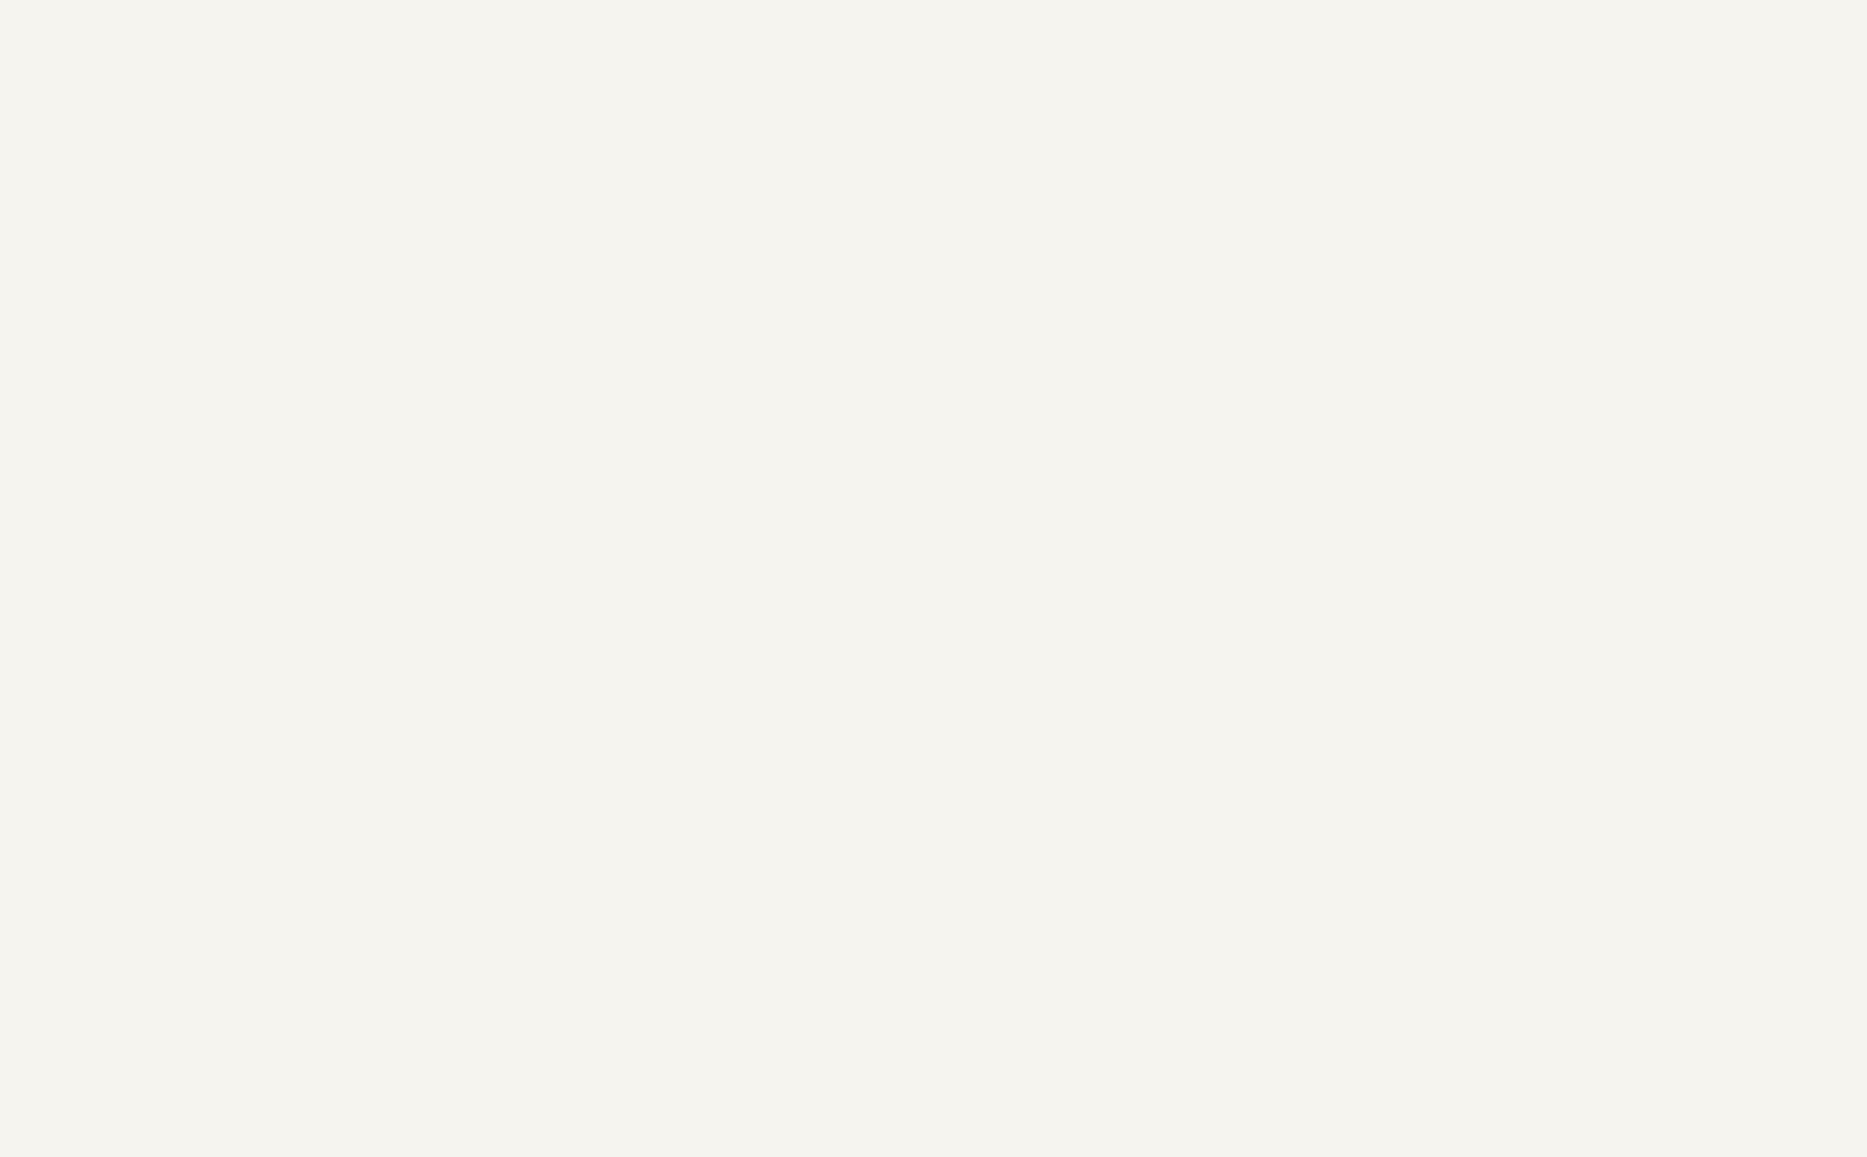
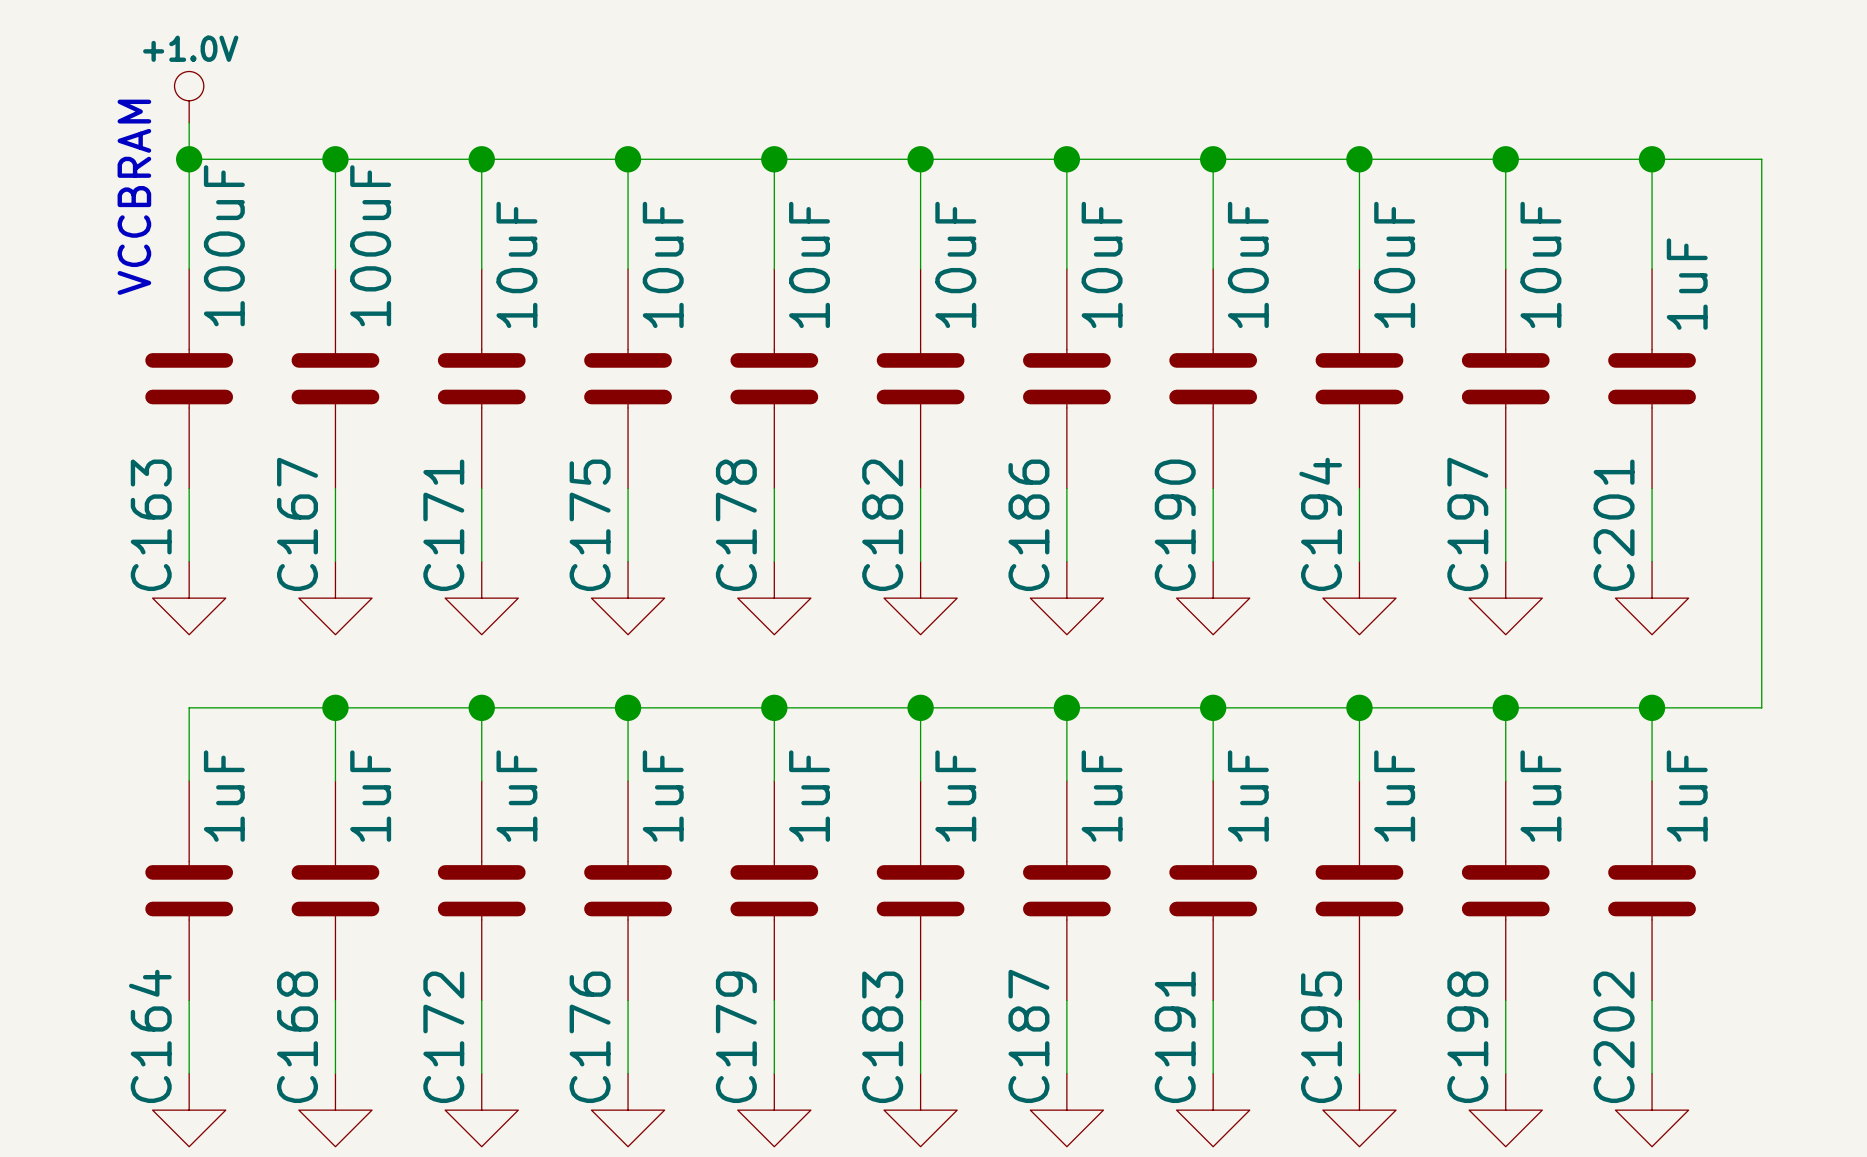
power symbol: none -> +1.0V (189, 97)
wire: none -> (189, 122) (189, 269)
wire: none -> (189, 159) (1761, 159) (1761, 707) (189, 707) (189, 781)
junction: none -> (189, 159)
wire: none -> (335, 159) (335, 269)
junction: none -> (335, 159)
wire: none -> (481, 159) (481, 269)
junction: none -> (481, 159)
wire: none -> (628, 159) (628, 269)
junction: none -> (628, 159)
wire: none -> (774, 159) (774, 269)
junction: none -> (774, 159)
wire: none -> (920, 159) (920, 269)
junction: none -> (920, 159)
wire: none -> (1066, 159) (1066, 269)
junction: none -> (1066, 159)
wire: none -> (1213, 159) (1213, 269)
junction: none -> (1213, 159)
wire: none -> (1359, 159) (1359, 269)
junction: none -> (1359, 159)
wire: none -> (1505, 159) (1505, 269)
junction: none -> (1505, 159)
wire: none -> (1652, 159) (1652, 269)
junction: none -> (1652, 159)
text: none -> VCCBRAM (134, 197)
C163: none -> 100uF (189, 378)
C167: none -> 100uF (335, 378)
C171: none -> 10uF (481, 378)
C175: none -> 10uF (628, 378)
C178: none -> 10uF (774, 378)
C182: none -> 10uF (920, 378)
C186: none -> 10uF (1066, 378)
C190: none -> 10uF (1213, 378)
C194: none -> 10uF (1359, 378)
C197: none -> 10uF (1505, 378)
C201: none -> 1uF (1652, 378)
wire: none -> (189, 488) (189, 561)
wire: none -> (335, 488) (335, 561)
wire: none -> (481, 488) (481, 561)
wire: none -> (628, 488) (628, 561)
wire: none -> (774, 488) (774, 561)
wire: none -> (920, 488) (920, 561)
wire: none -> (1066, 488) (1066, 561)
wire: none -> (1213, 488) (1213, 561)
wire: none -> (1359, 488) (1359, 561)
wire: none -> (1505, 488) (1505, 561)
wire: none -> (1652, 488) (1652, 561)
power symbol: none -> (189, 598)
power symbol: none -> (335, 598)
power symbol: none -> (481, 598)
power symbol: none -> (628, 598)
power symbol: none -> (774, 598)
power symbol: none -> (920, 598)
power symbol: none -> (1066, 598)
power symbol: none -> (1213, 598)
power symbol: none -> (1359, 598)
power symbol: none -> (1505, 598)
power symbol: none -> (1652, 598)
wire: none -> (335, 707) (335, 781)
junction: none -> (335, 707)
wire: none -> (481, 707) (481, 781)
junction: none -> (481, 707)
wire: none -> (628, 707) (628, 781)
junction: none -> (628, 707)
wire: none -> (774, 707) (774, 781)
junction: none -> (774, 707)
wire: none -> (920, 707) (920, 781)
junction: none -> (920, 707)
wire: none -> (1066, 707) (1066, 781)
junction: none -> (1066, 707)
wire: none -> (1213, 707) (1213, 781)
junction: none -> (1213, 707)
wire: none -> (1359, 707) (1359, 781)
junction: none -> (1359, 707)
wire: none -> (1505, 707) (1505, 781)
junction: none -> (1505, 707)
wire: none -> (1652, 707) (1652, 781)
junction: none -> (1652, 707)
C164: none -> 1uF (189, 890)
C168: none -> 1uF (335, 890)
C172: none -> 1uF (481, 890)
C176: none -> 1uF (628, 890)
C179: none -> 1uF (774, 890)
C183: none -> 1uF (920, 890)
C187: none -> 1uF (1066, 890)
C191: none -> 1uF (1213, 890)
C195: none -> 1uF (1359, 890)
C198: none -> 1uF (1505, 890)
C202: none -> 1uF (1652, 890)
wire: none -> (189, 1000) (189, 1073)
wire: none -> (335, 1000) (335, 1073)
wire: none -> (481, 1000) (481, 1073)
wire: none -> (628, 1000) (628, 1073)
wire: none -> (774, 1000) (774, 1073)
wire: none -> (920, 1000) (920, 1073)
wire: none -> (1066, 1000) (1066, 1073)
wire: none -> (1213, 1000) (1213, 1073)
wire: none -> (1359, 1000) (1359, 1073)
wire: none -> (1505, 1000) (1505, 1073)
wire: none -> (1652, 1000) (1652, 1073)
power symbol: none -> (189, 1110)
power symbol: none -> (335, 1110)
power symbol: none -> (481, 1110)
power symbol: none -> (628, 1110)
power symbol: none -> (774, 1110)
power symbol: none -> (920, 1110)
power symbol: none -> (1066, 1110)
power symbol: none -> (1213, 1110)
power symbol: none -> (1359, 1110)
power symbol: none -> (1505, 1110)
power symbol: none -> (1652, 1110)

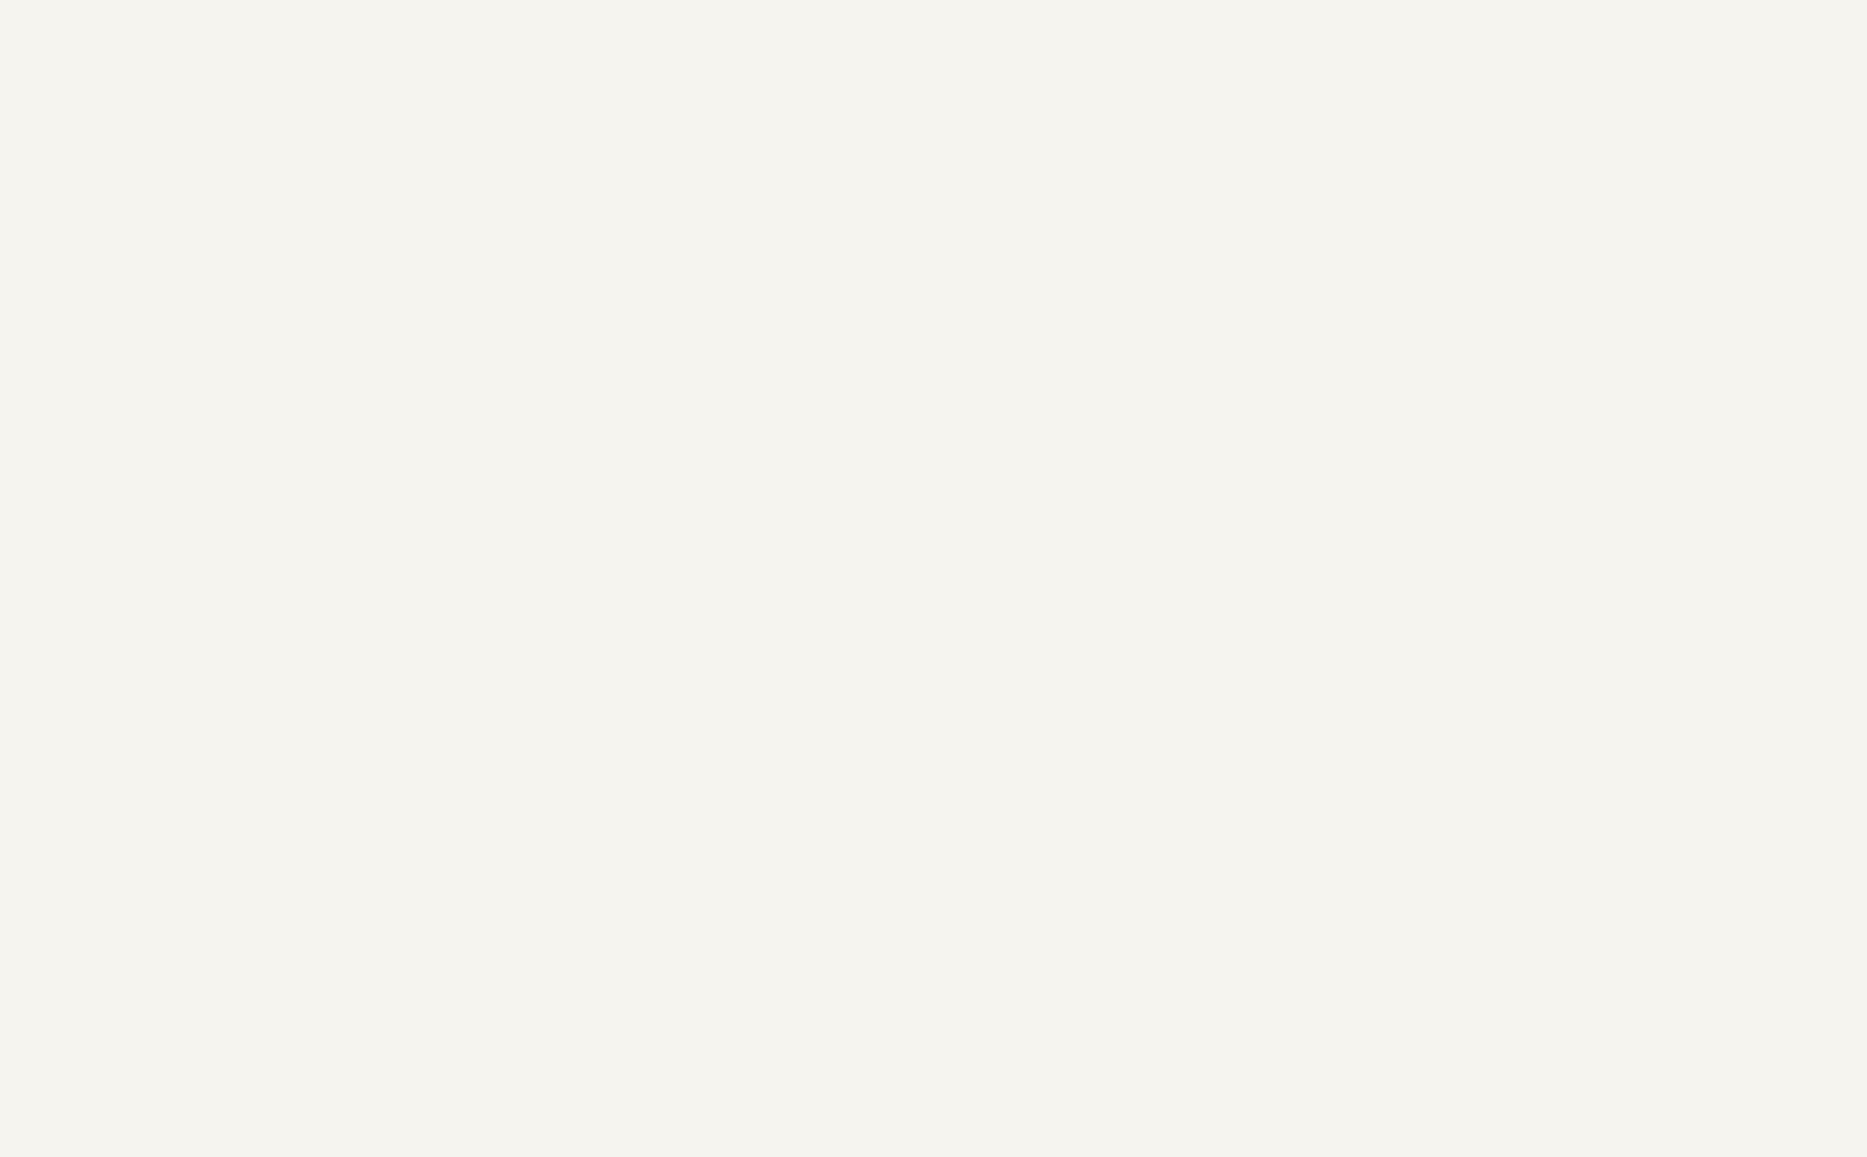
power symbol: +1.0V (189, 97) -> none
wire: (189, 122) (189, 269) -> none
wire: (189, 159) (1761, 159) (1761, 707) (189, 707) (189, 781) -> none
junction: (189, 159) -> none
wire: (335, 159) (335, 269) -> none
junction: (335, 159) -> none
wire: (481, 159) (481, 269) -> none
junction: (481, 159) -> none
wire: (628, 159) (628, 269) -> none
junction: (628, 159) -> none
wire: (774, 159) (774, 269) -> none
junction: (774, 159) -> none
wire: (920, 159) (920, 269) -> none
junction: (920, 159) -> none
wire: (1066, 159) (1066, 269) -> none
junction: (1066, 159) -> none
wire: (1213, 159) (1213, 269) -> none
junction: (1213, 159) -> none
wire: (1359, 159) (1359, 269) -> none
junction: (1359, 159) -> none
wire: (1505, 159) (1505, 269) -> none
junction: (1505, 159) -> none
wire: (1652, 159) (1652, 269) -> none
junction: (1652, 159) -> none
text: VCCBRAM (134, 197) -> none
C163: 100uF (189, 378) -> none
C167: 100uF (335, 378) -> none
C171: 10uF (481, 378) -> none
C175: 10uF (628, 378) -> none
C178: 10uF (774, 378) -> none
C182: 10uF (920, 378) -> none
C186: 10uF (1066, 378) -> none
C190: 10uF (1213, 378) -> none
C194: 10uF (1359, 378) -> none
C197: 10uF (1505, 378) -> none
C201: 1uF (1652, 378) -> none
wire: (189, 488) (189, 561) -> none
wire: (335, 488) (335, 561) -> none
wire: (481, 488) (481, 561) -> none
wire: (628, 488) (628, 561) -> none
wire: (774, 488) (774, 561) -> none
wire: (920, 488) (920, 561) -> none
wire: (1066, 488) (1066, 561) -> none
wire: (1213, 488) (1213, 561) -> none
wire: (1359, 488) (1359, 561) -> none
wire: (1505, 488) (1505, 561) -> none
wire: (1652, 488) (1652, 561) -> none
power symbol: (189, 598) -> none
power symbol: (335, 598) -> none
power symbol: (481, 598) -> none
power symbol: (628, 598) -> none
power symbol: (774, 598) -> none
power symbol: (920, 598) -> none
power symbol: (1066, 598) -> none
power symbol: (1213, 598) -> none
power symbol: (1359, 598) -> none
power symbol: (1505, 598) -> none
power symbol: (1652, 598) -> none
wire: (335, 707) (335, 781) -> none
junction: (335, 707) -> none
wire: (481, 707) (481, 781) -> none
junction: (481, 707) -> none
wire: (628, 707) (628, 781) -> none
junction: (628, 707) -> none
wire: (774, 707) (774, 781) -> none
junction: (774, 707) -> none
wire: (920, 707) (920, 781) -> none
junction: (920, 707) -> none
wire: (1066, 707) (1066, 781) -> none
junction: (1066, 707) -> none
wire: (1213, 707) (1213, 781) -> none
junction: (1213, 707) -> none
wire: (1359, 707) (1359, 781) -> none
junction: (1359, 707) -> none
wire: (1505, 707) (1505, 781) -> none
junction: (1505, 707) -> none
wire: (1652, 707) (1652, 781) -> none
junction: (1652, 707) -> none
C164: 1uF (189, 890) -> none
C168: 1uF (335, 890) -> none
C172: 1uF (481, 890) -> none
C176: 1uF (628, 890) -> none
C179: 1uF (774, 890) -> none
C183: 1uF (920, 890) -> none
C187: 1uF (1066, 890) -> none
C191: 1uF (1213, 890) -> none
C195: 1uF (1359, 890) -> none
C198: 1uF (1505, 890) -> none
C202: 1uF (1652, 890) -> none
wire: (189, 1000) (189, 1073) -> none
wire: (335, 1000) (335, 1073) -> none
wire: (481, 1000) (481, 1073) -> none
wire: (628, 1000) (628, 1073) -> none
wire: (774, 1000) (774, 1073) -> none
wire: (920, 1000) (920, 1073) -> none
wire: (1066, 1000) (1066, 1073) -> none
wire: (1213, 1000) (1213, 1073) -> none
wire: (1359, 1000) (1359, 1073) -> none
wire: (1505, 1000) (1505, 1073) -> none
wire: (1652, 1000) (1652, 1073) -> none
power symbol: (189, 1110) -> none
power symbol: (335, 1110) -> none
power symbol: (481, 1110) -> none
power symbol: (628, 1110) -> none
power symbol: (774, 1110) -> none
power symbol: (920, 1110) -> none
power symbol: (1066, 1110) -> none
power symbol: (1213, 1110) -> none
power symbol: (1359, 1110) -> none
power symbol: (1505, 1110) -> none
power symbol: (1652, 1110) -> none

